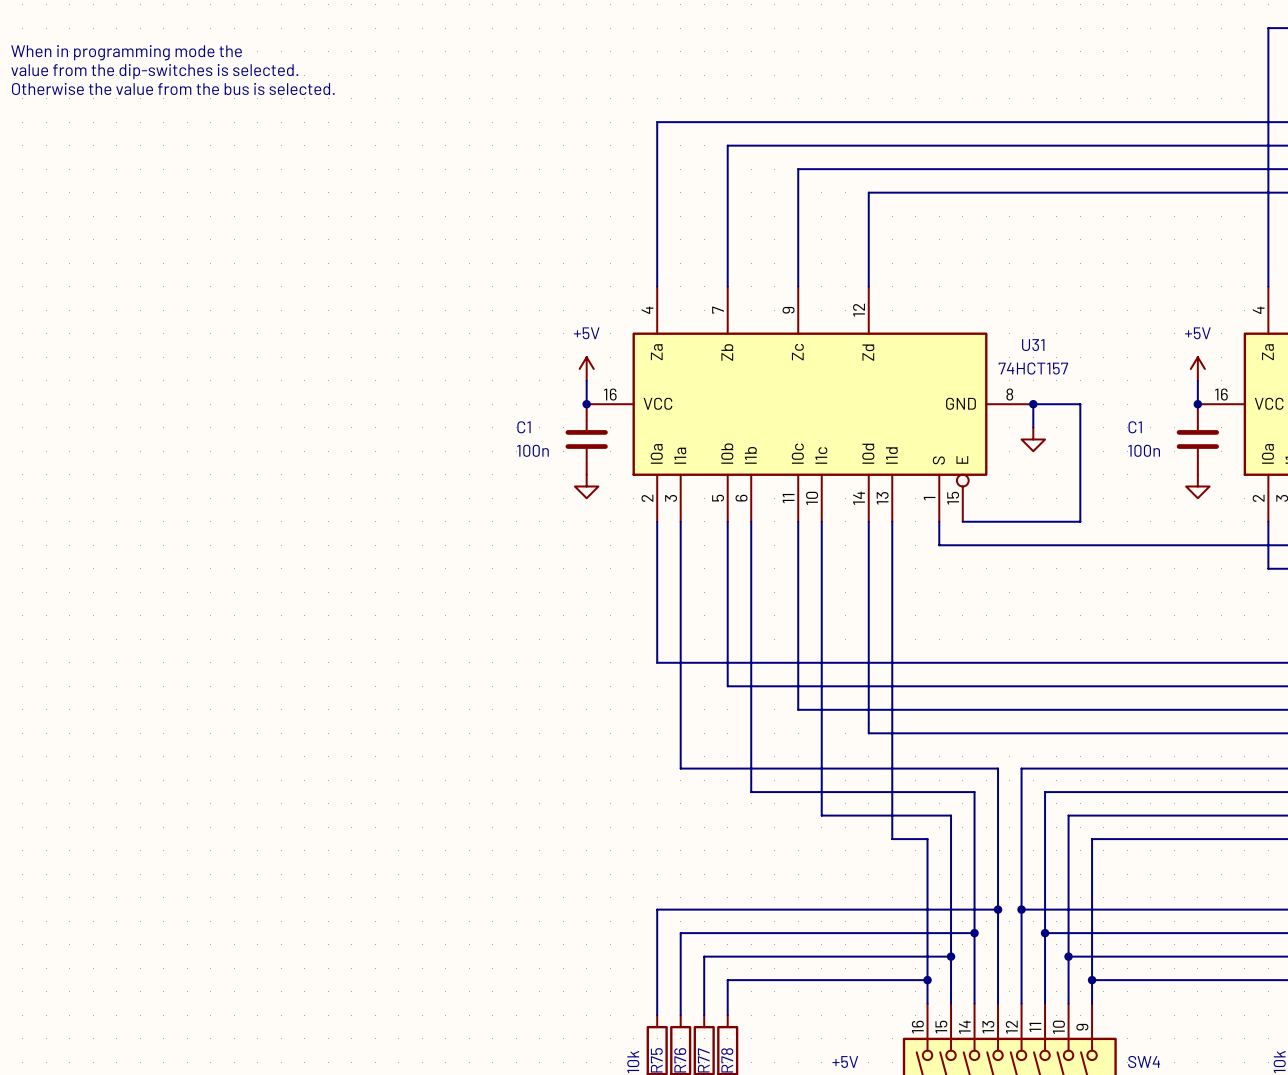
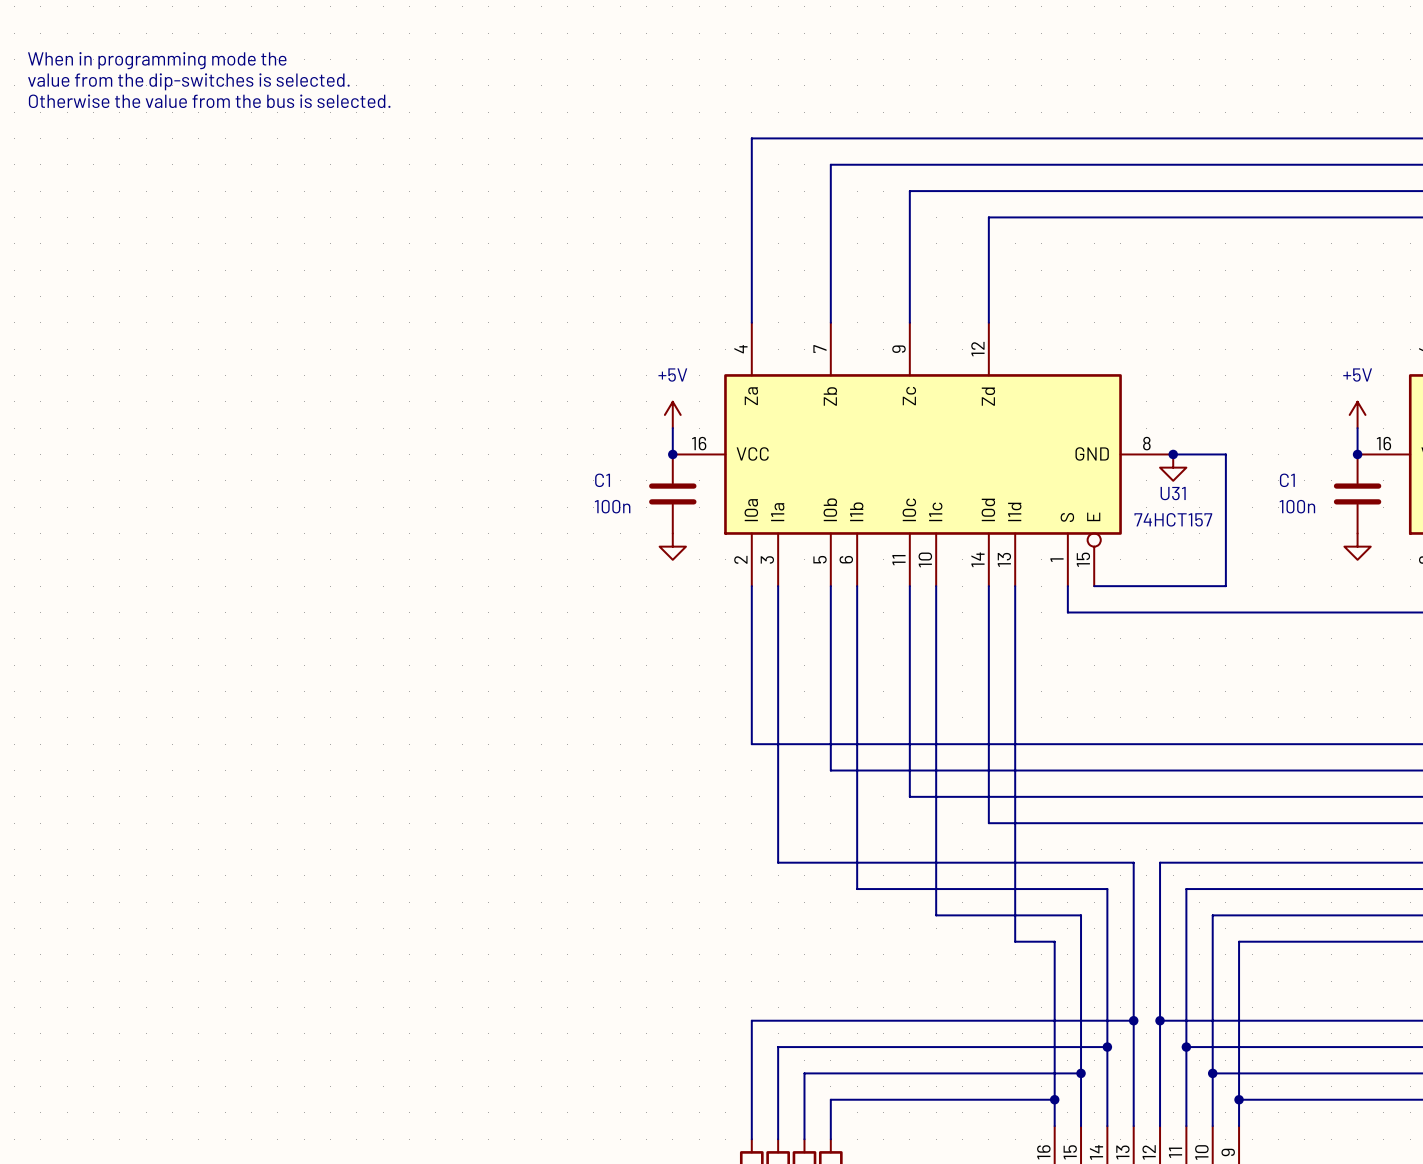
U31 name position: U31 (1033, 345) -> U31 (1173, 493)
U31 value position: 74HCT157 (1033, 368) -> 74HCT157 (1173, 519)
power symbol position: (1033, 439) -> (1173, 467)

